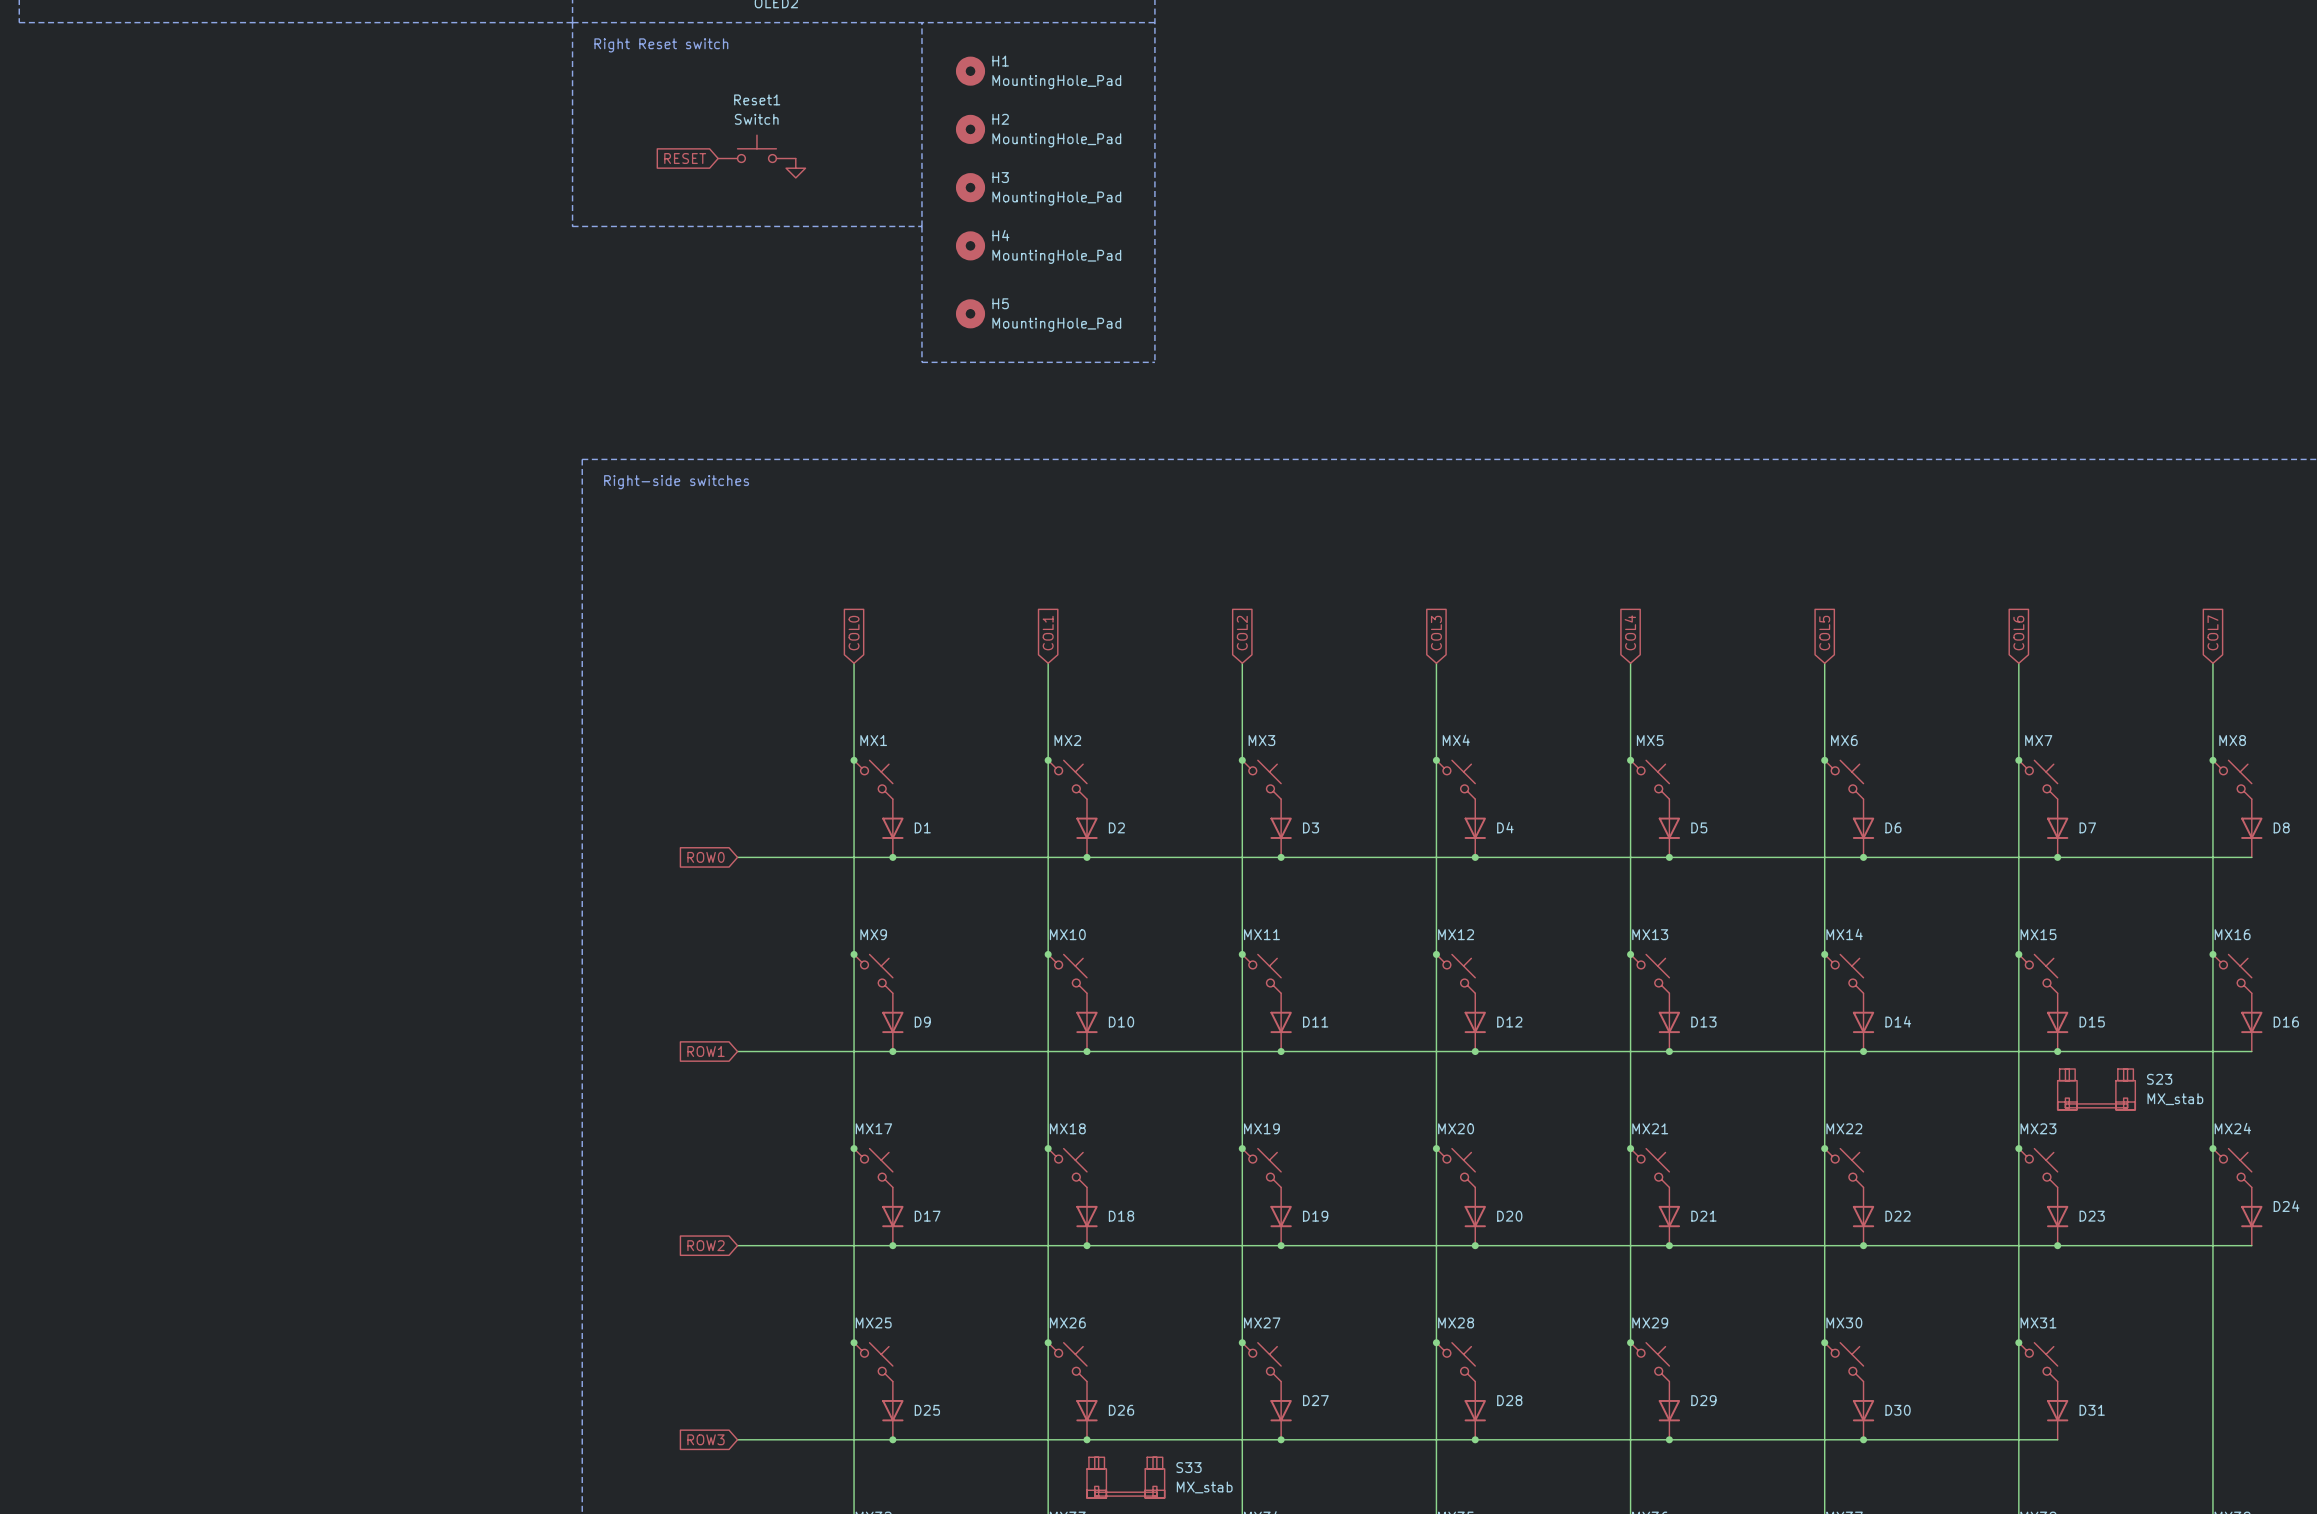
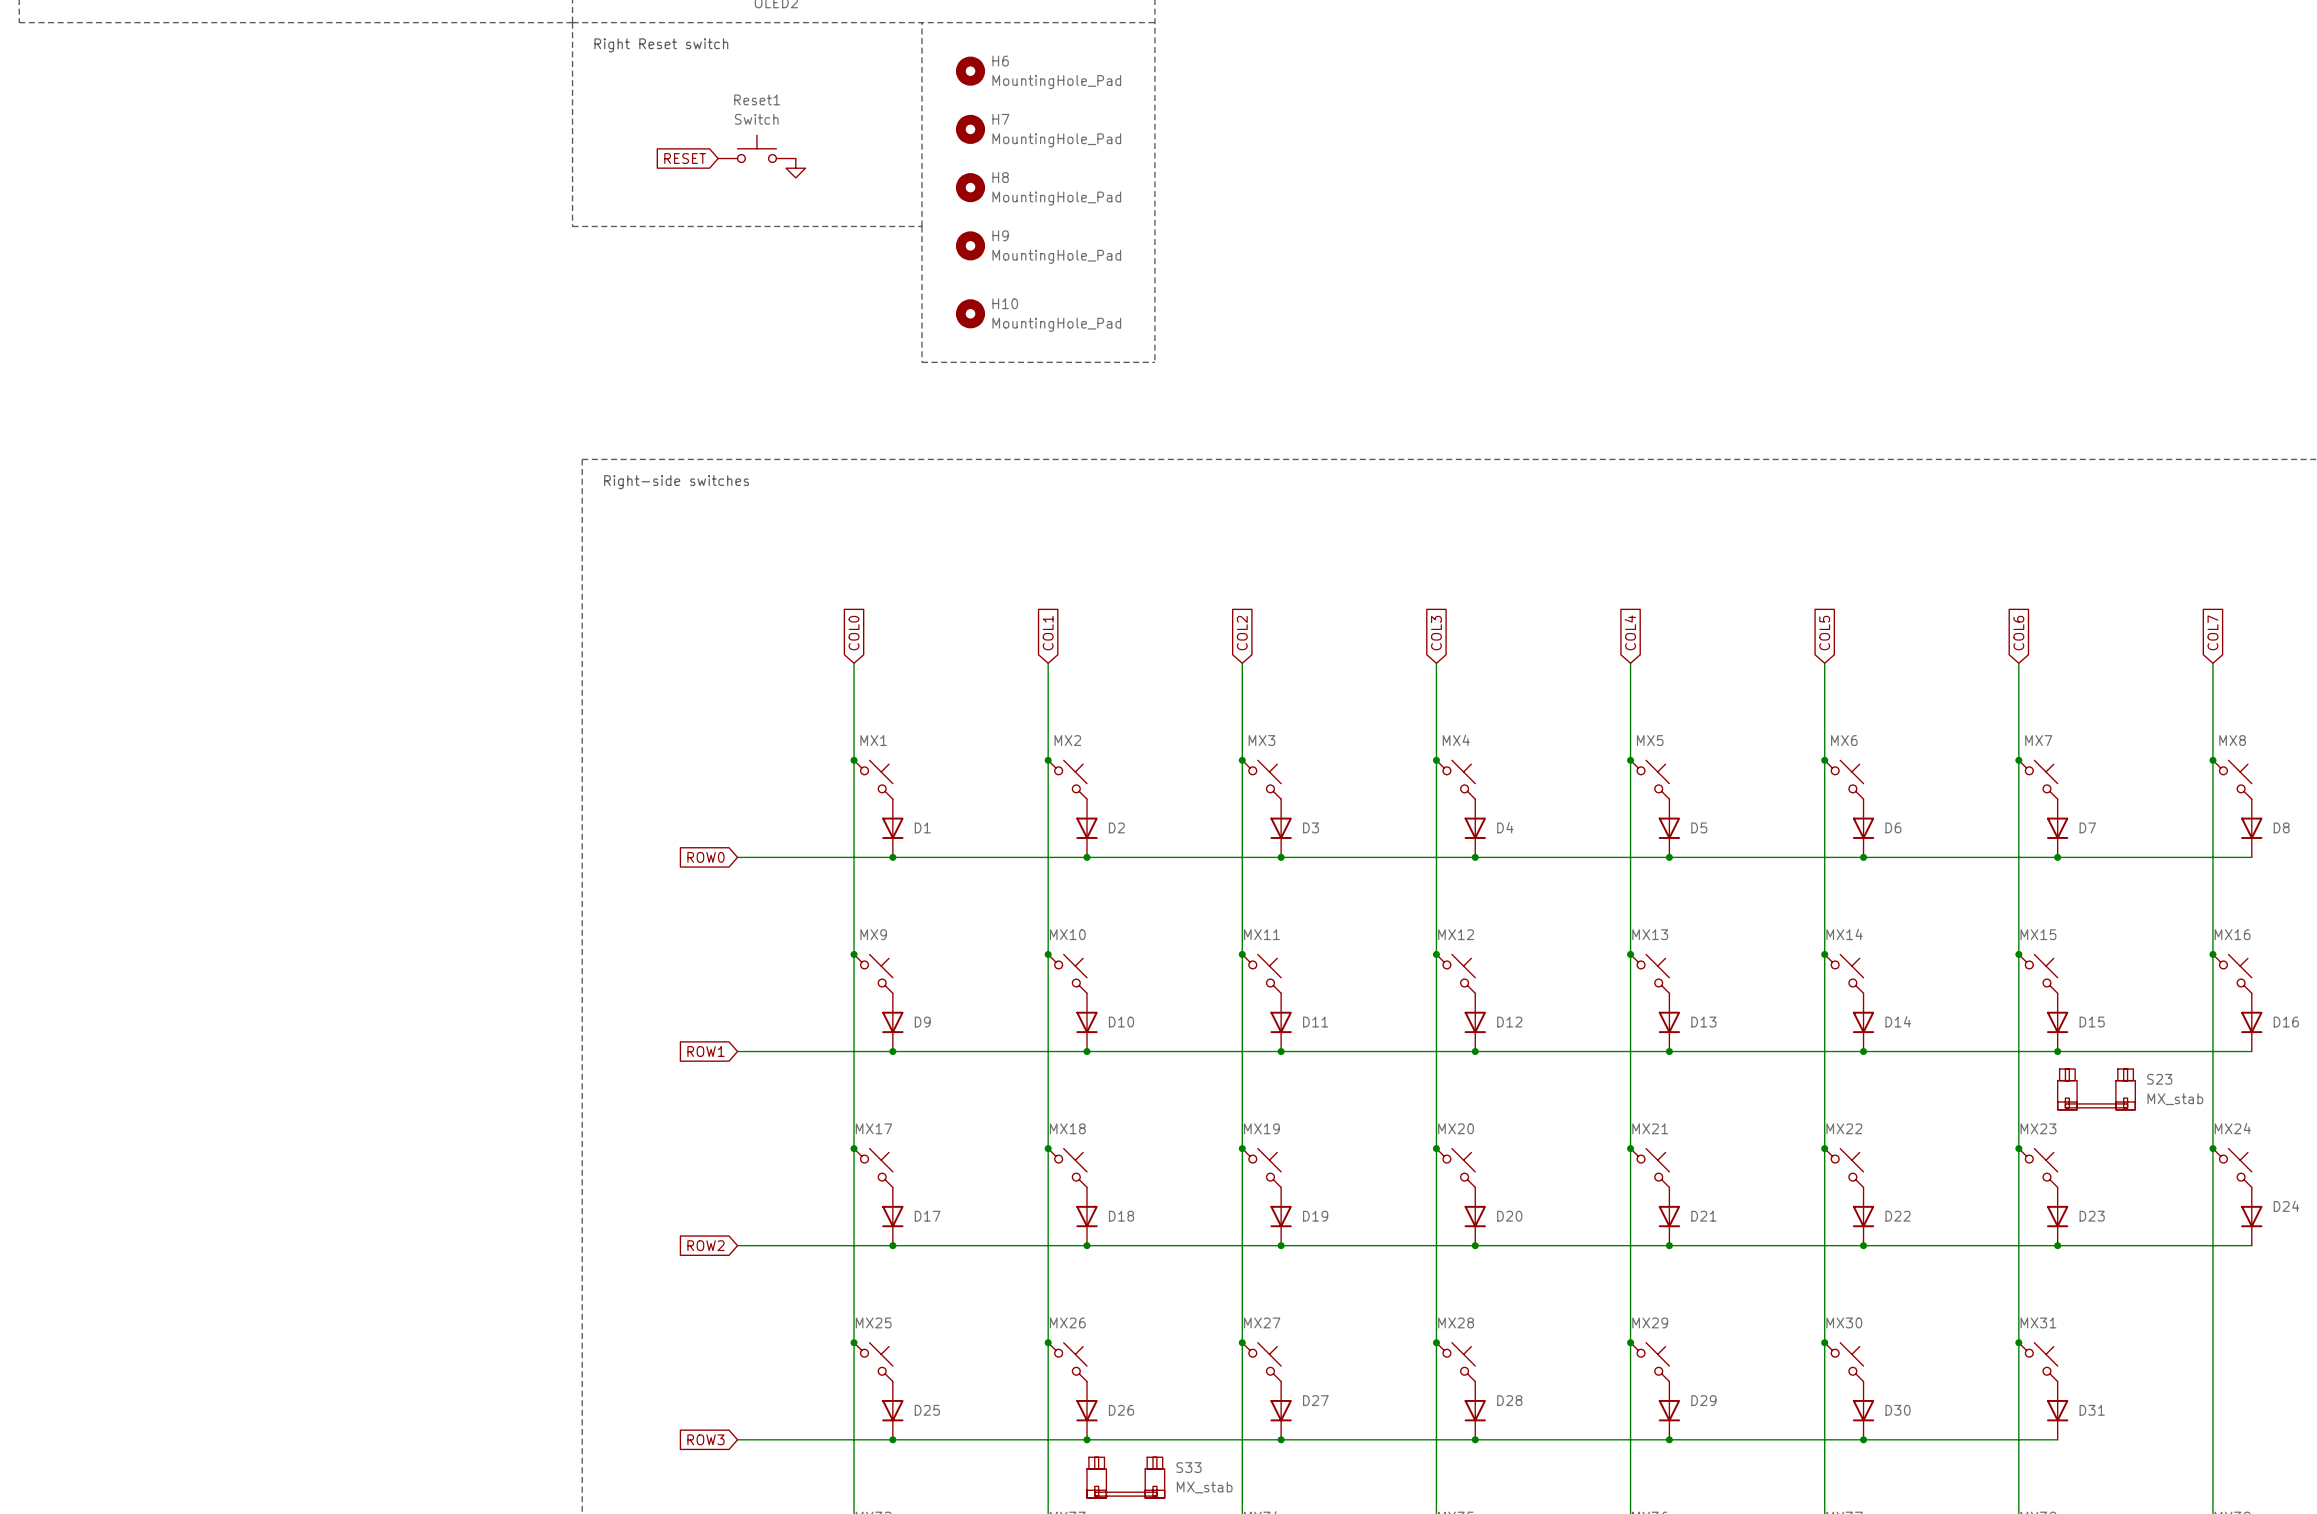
H1 name: H1 (1000, 61) -> H6 (1000, 61)
H2 name: H2 (1000, 119) -> H7 (1000, 119)
H3 name: H3 (1000, 177) -> H8 (1000, 177)
H4 name: H4 (1000, 235) -> H9 (1000, 235)
H5 name: H5 (1000, 303) -> H10 (1005, 303)

